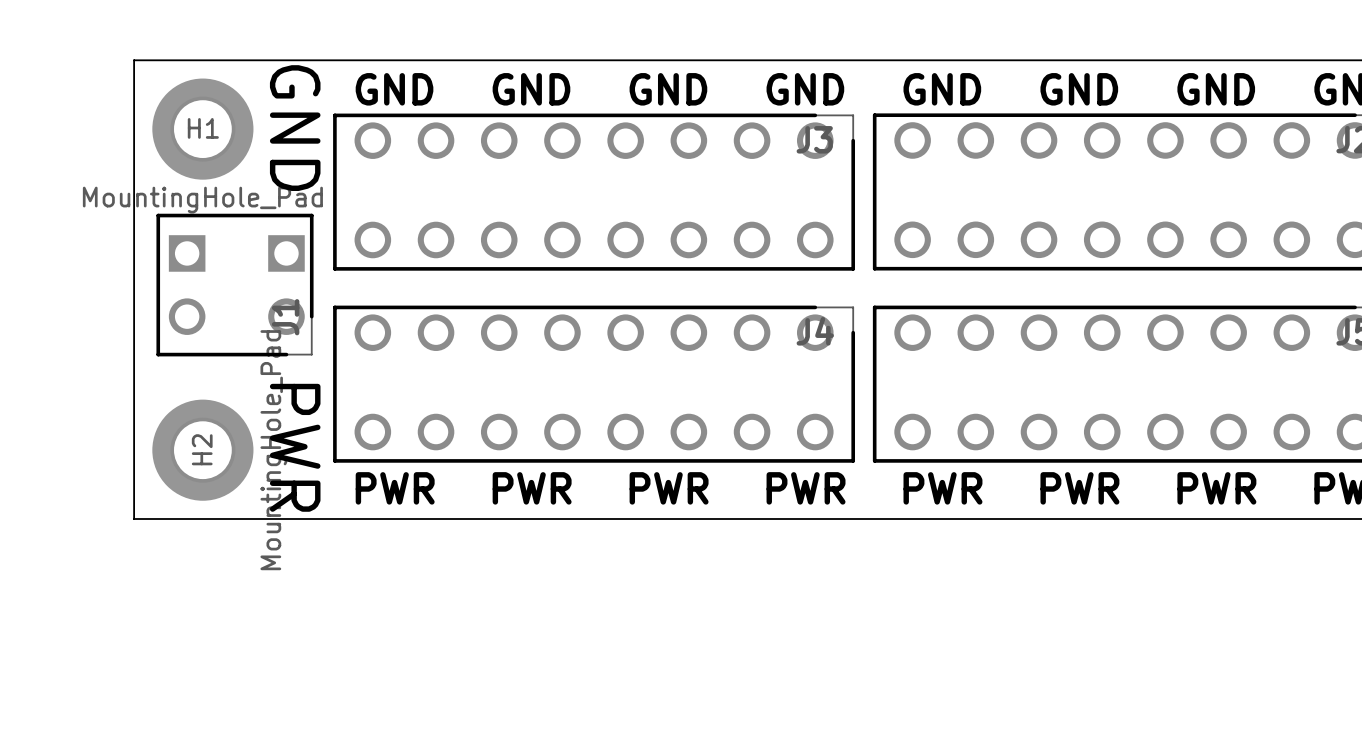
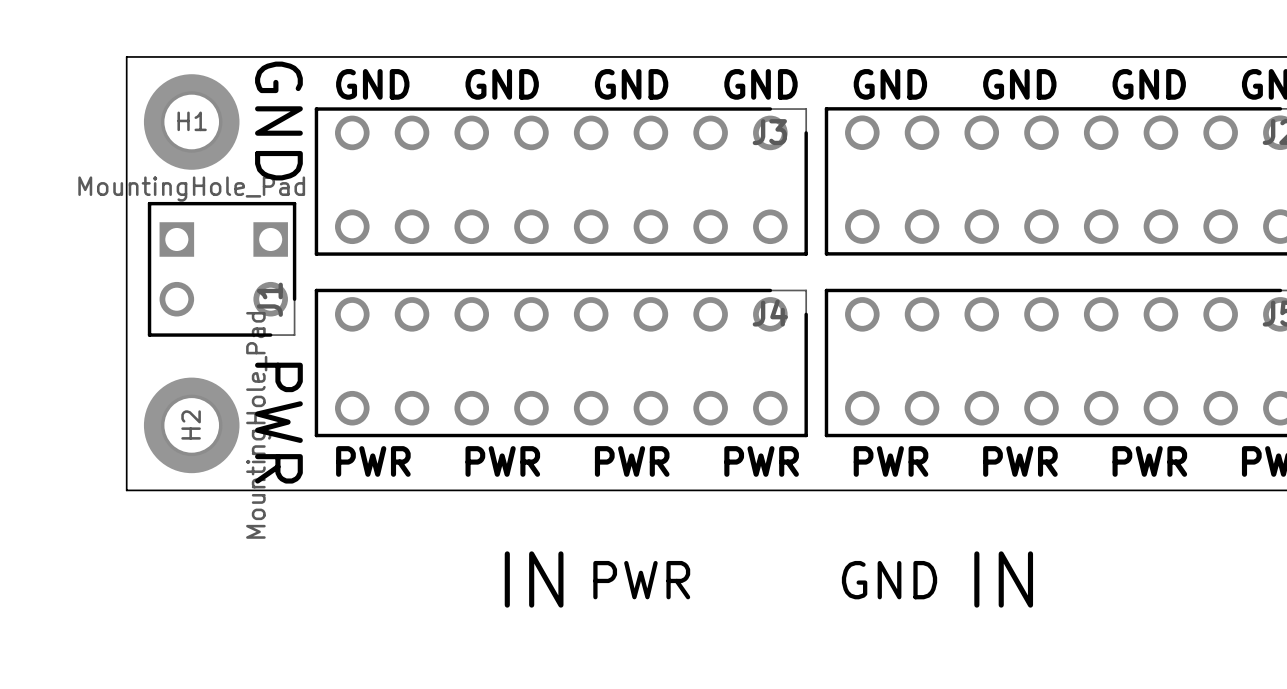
text: none -> IN (534, 579)
text: none -> PWR (641, 580)
text: none -> GND (889, 580)
text: none -> IN (1003, 579)

